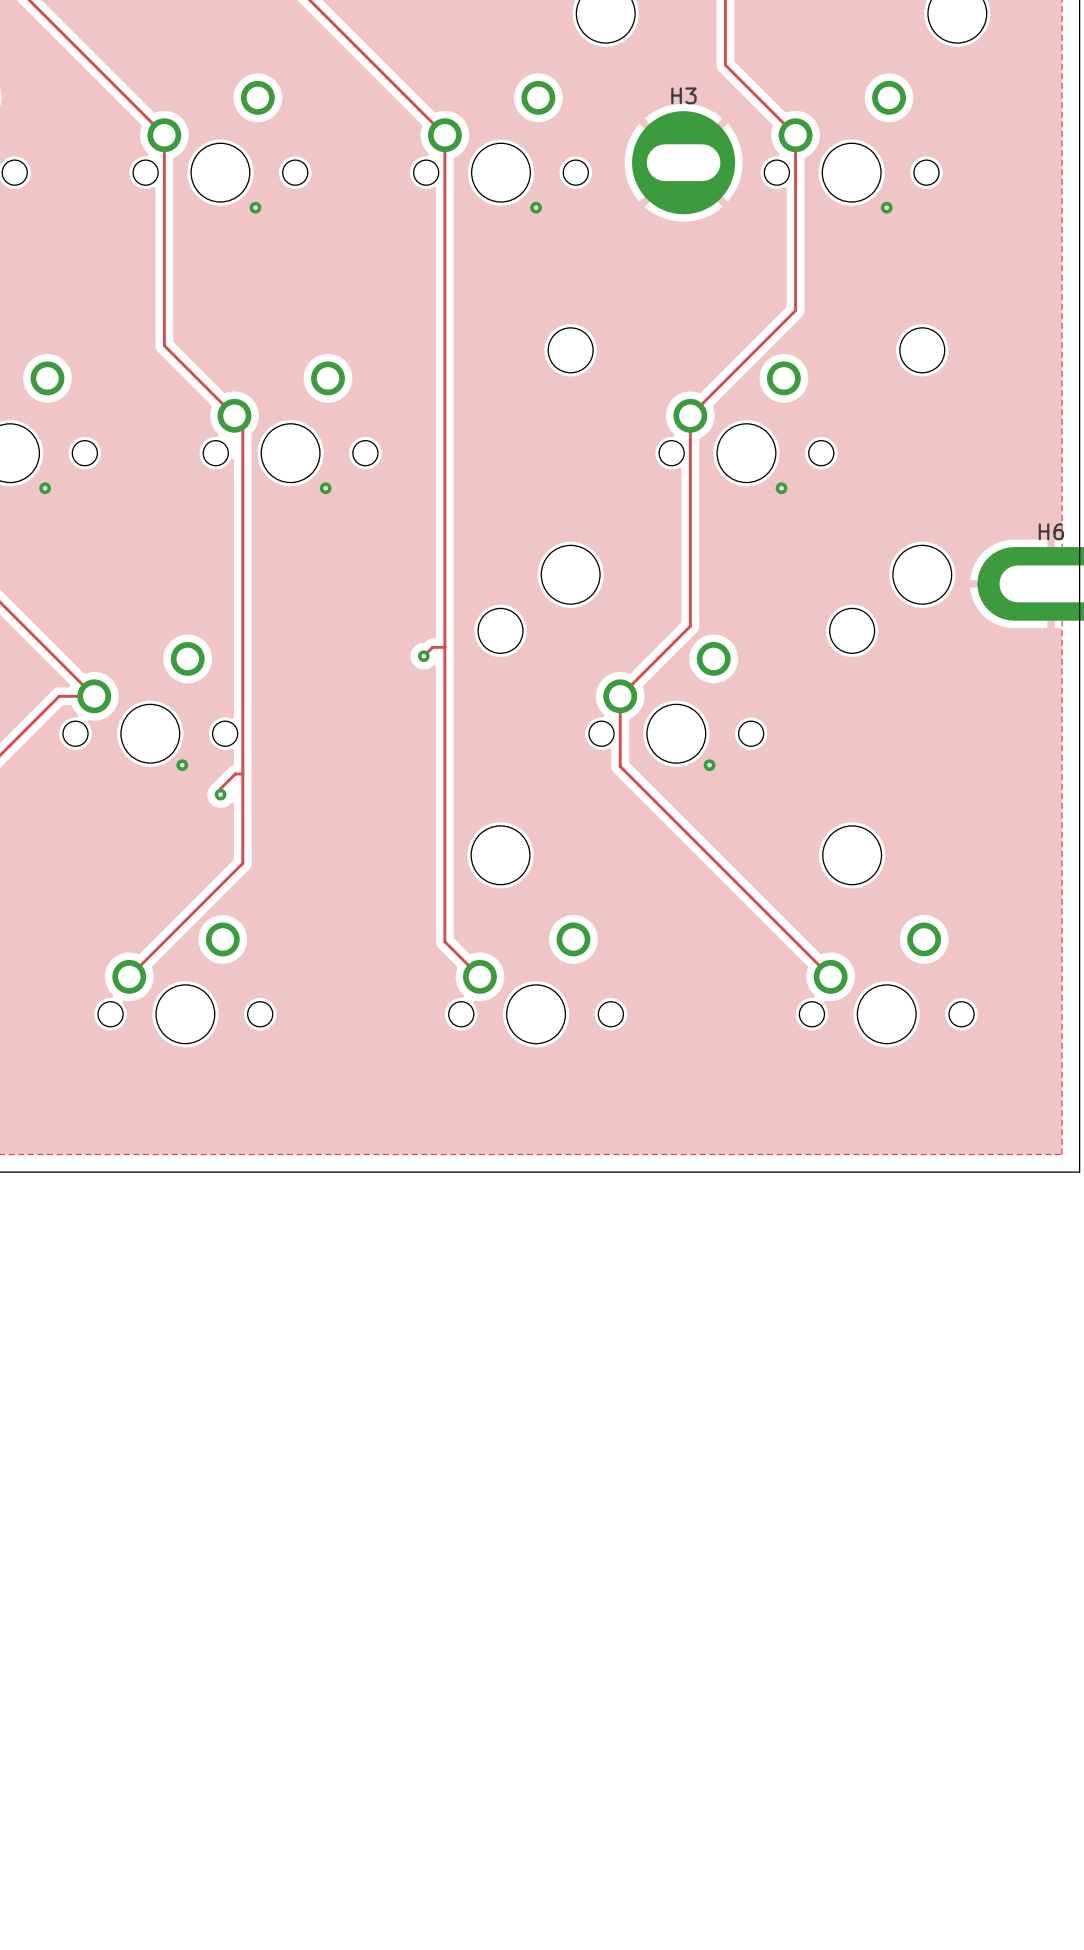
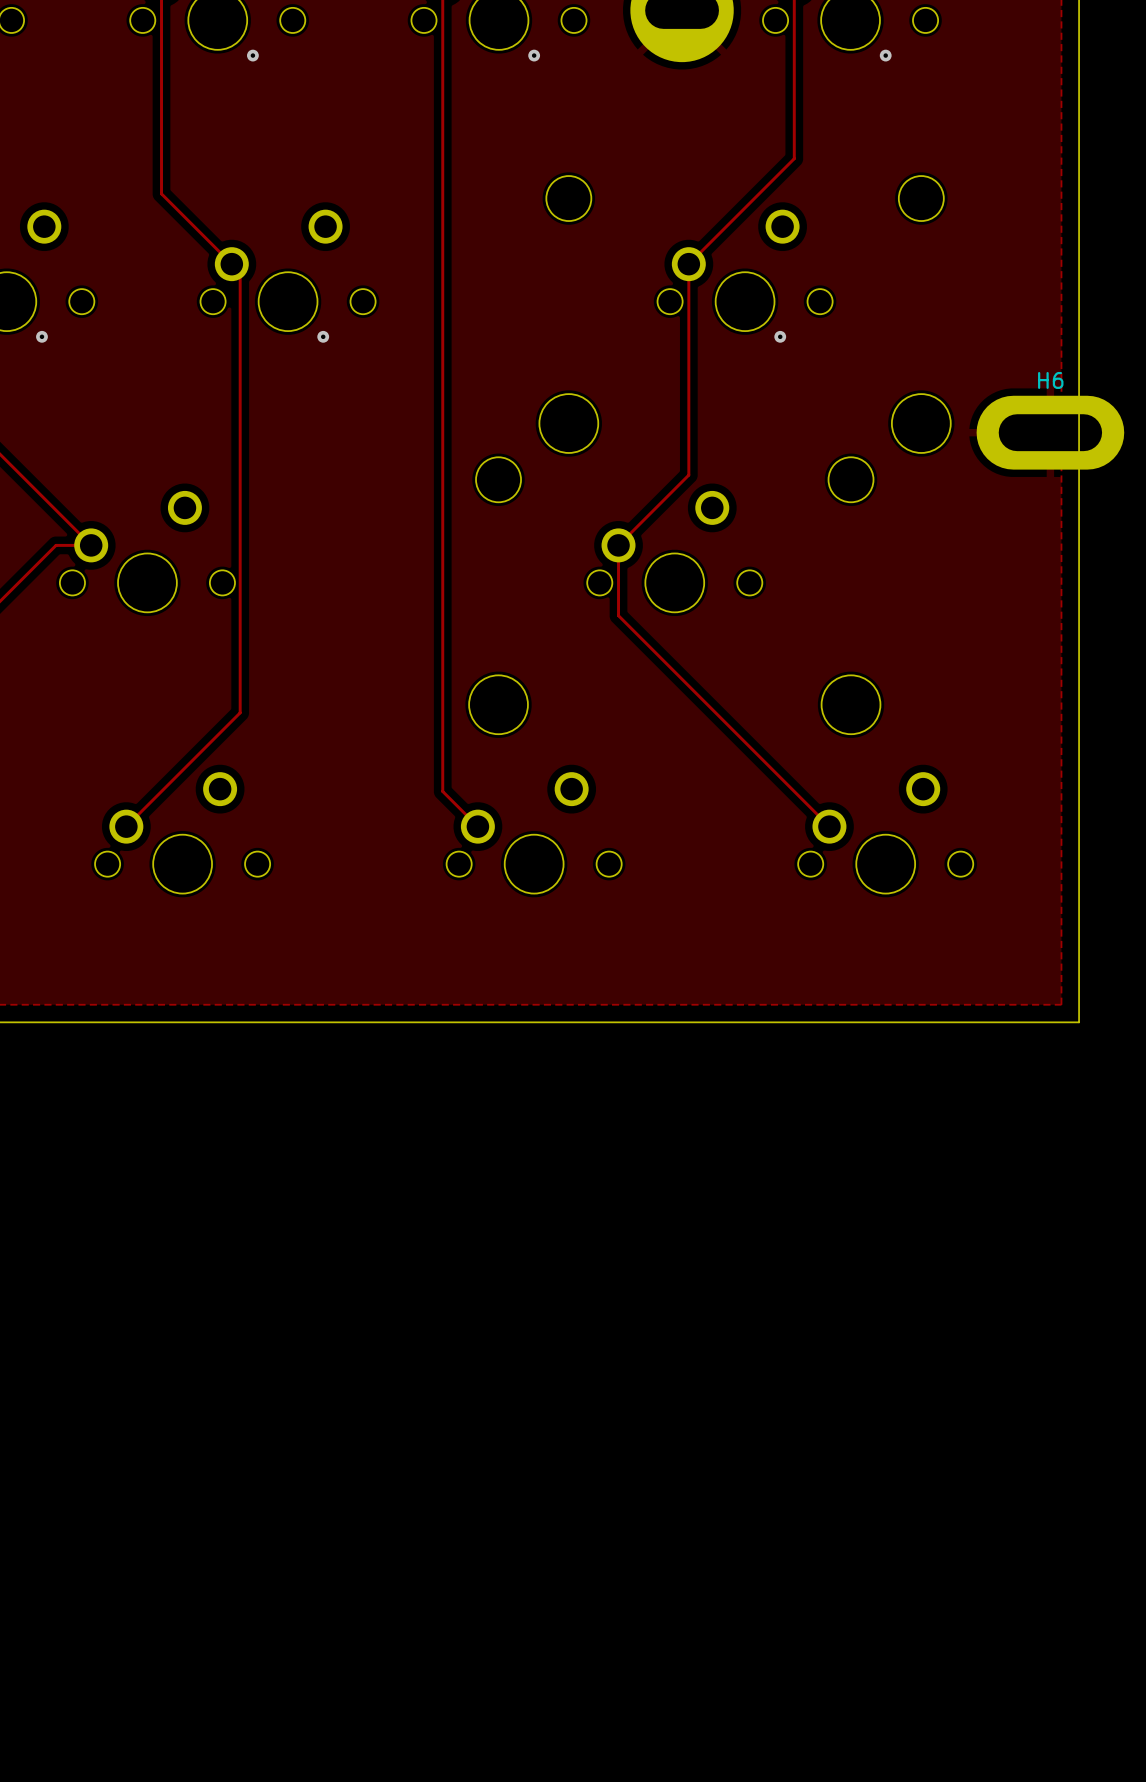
track: (444, 647) (432, 647) (423, 656) -> none
via: (423, 656) -> none
via: (182, 765) -> none
via: (709, 765) -> none
track: (242, 773) (235, 773) (220, 788) (220, 794) -> none
via: (220, 794) -> none

